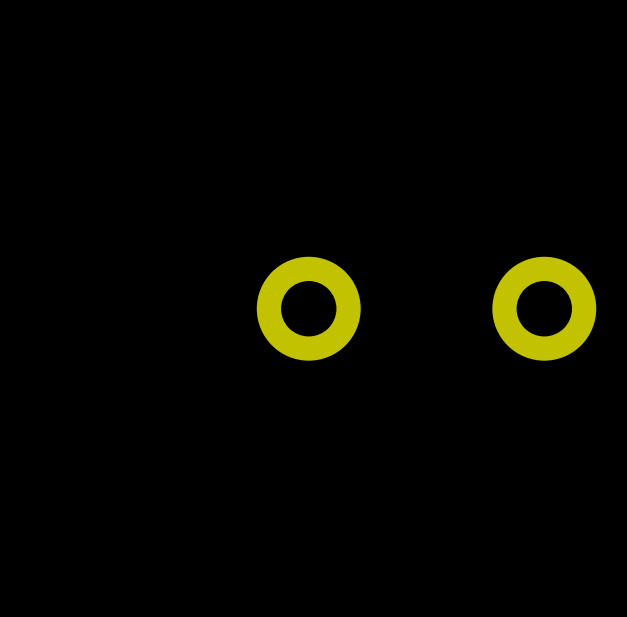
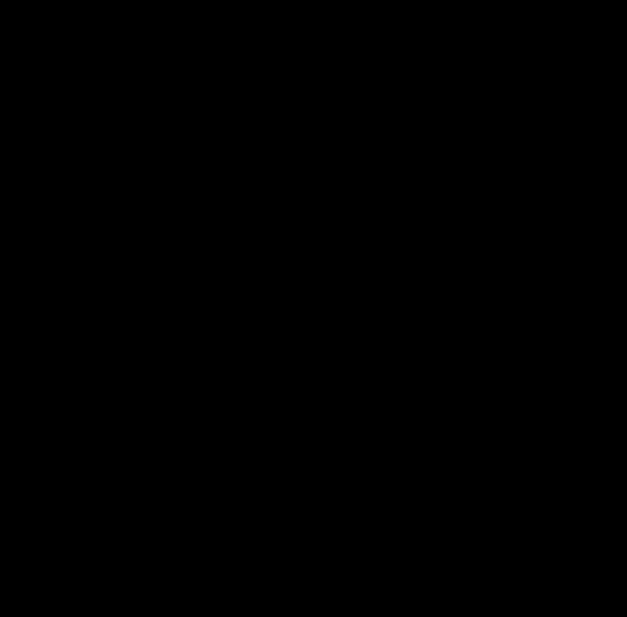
part: (426, 308) -> none

